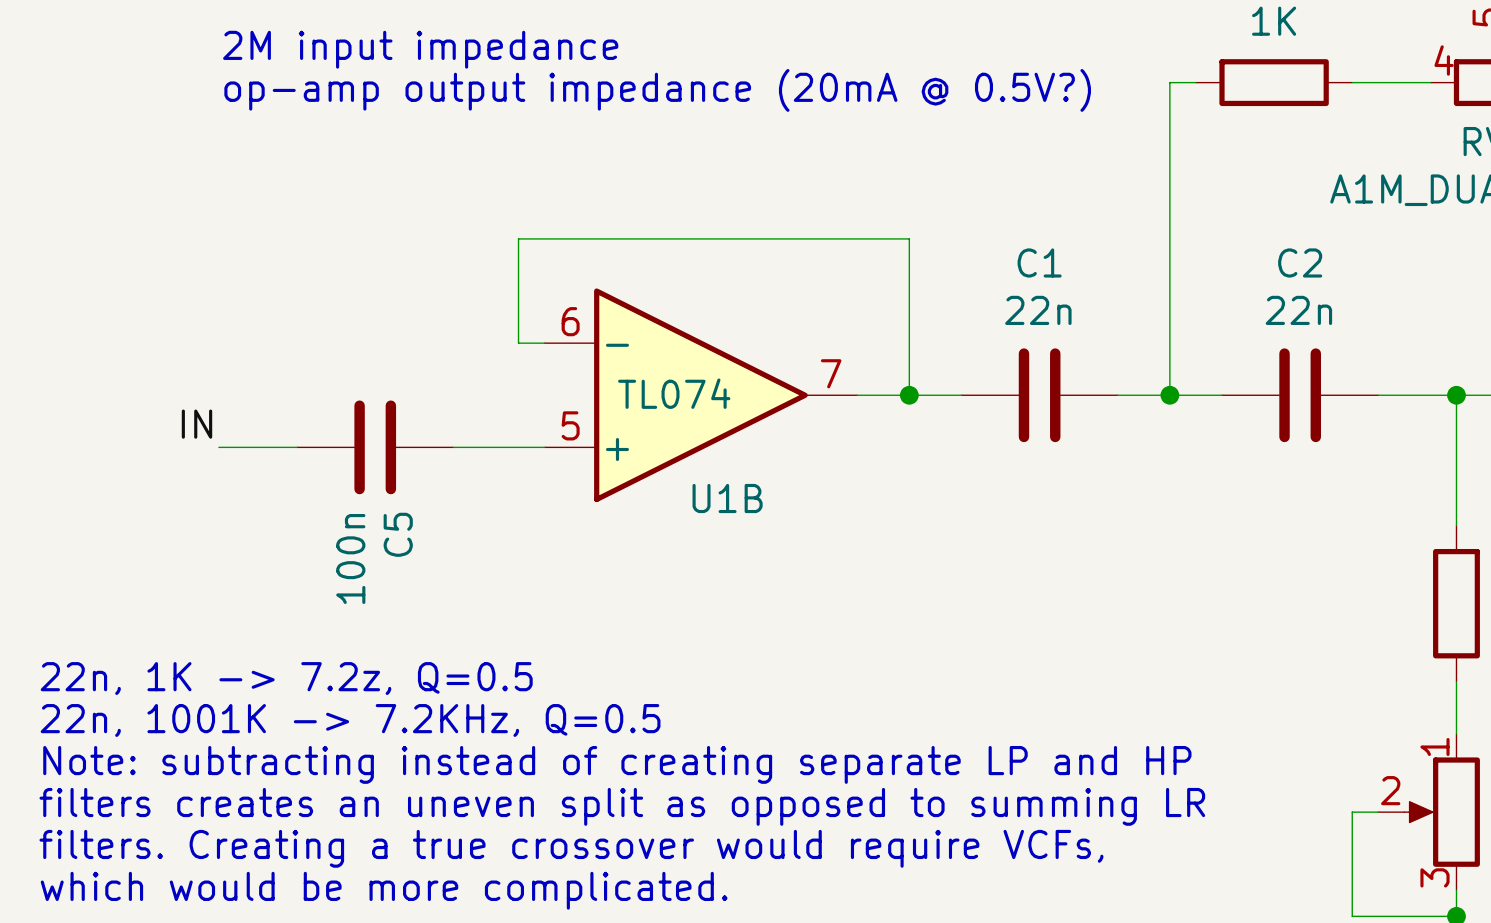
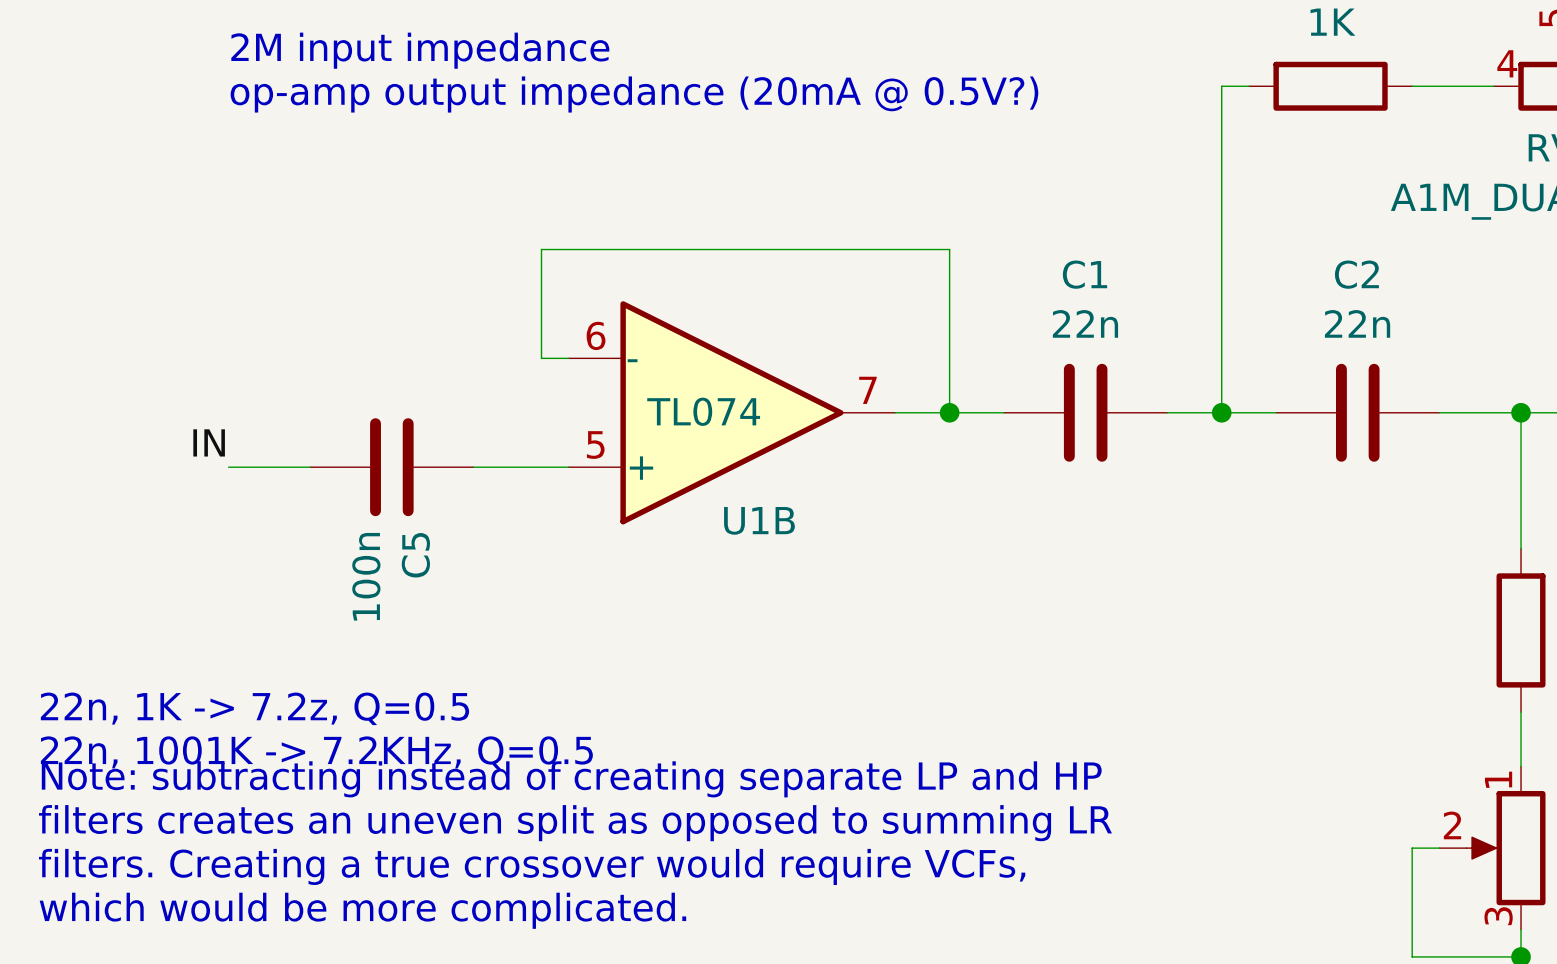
text position: Note: subtracting instead of creating separate LP and HP (617, 764) -> Note: subtracting instead of creating separate LP and HP (571, 779)
text position: filters creates an uneven split as opposed to summing LR (622, 806) -> filters creates an uneven split as opposed to summing LR (575, 823)
text position: filters. Creating a true crossover would require VCFs, (571, 848) -> filters. Creating a true crossover would require VCFs, (532, 866)
text position: which would be more complicated. (384, 890) -> which would be more complicated. (362, 910)

